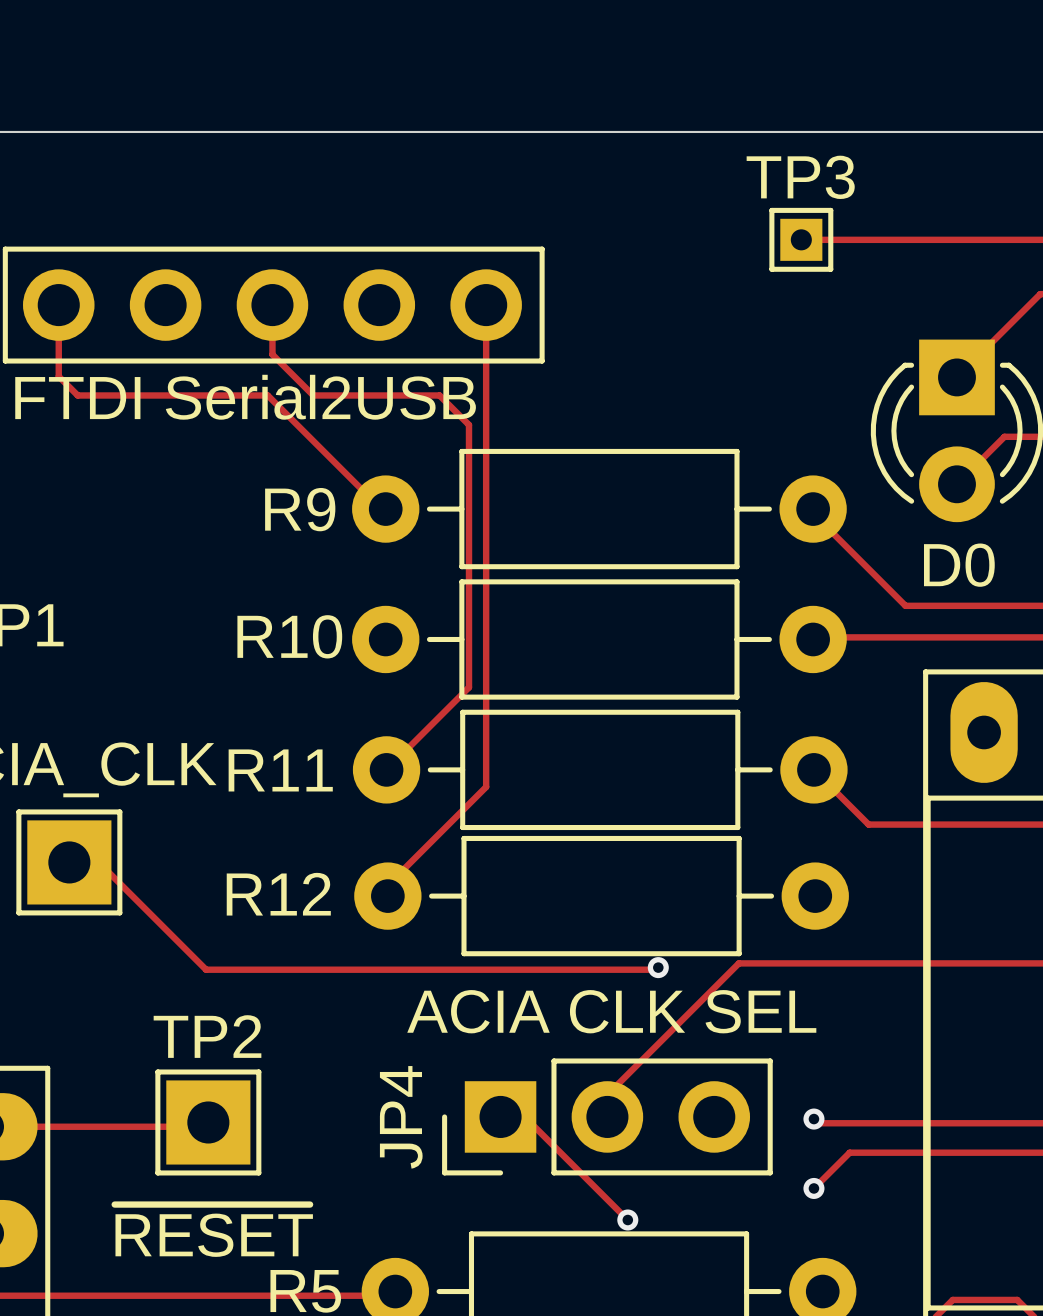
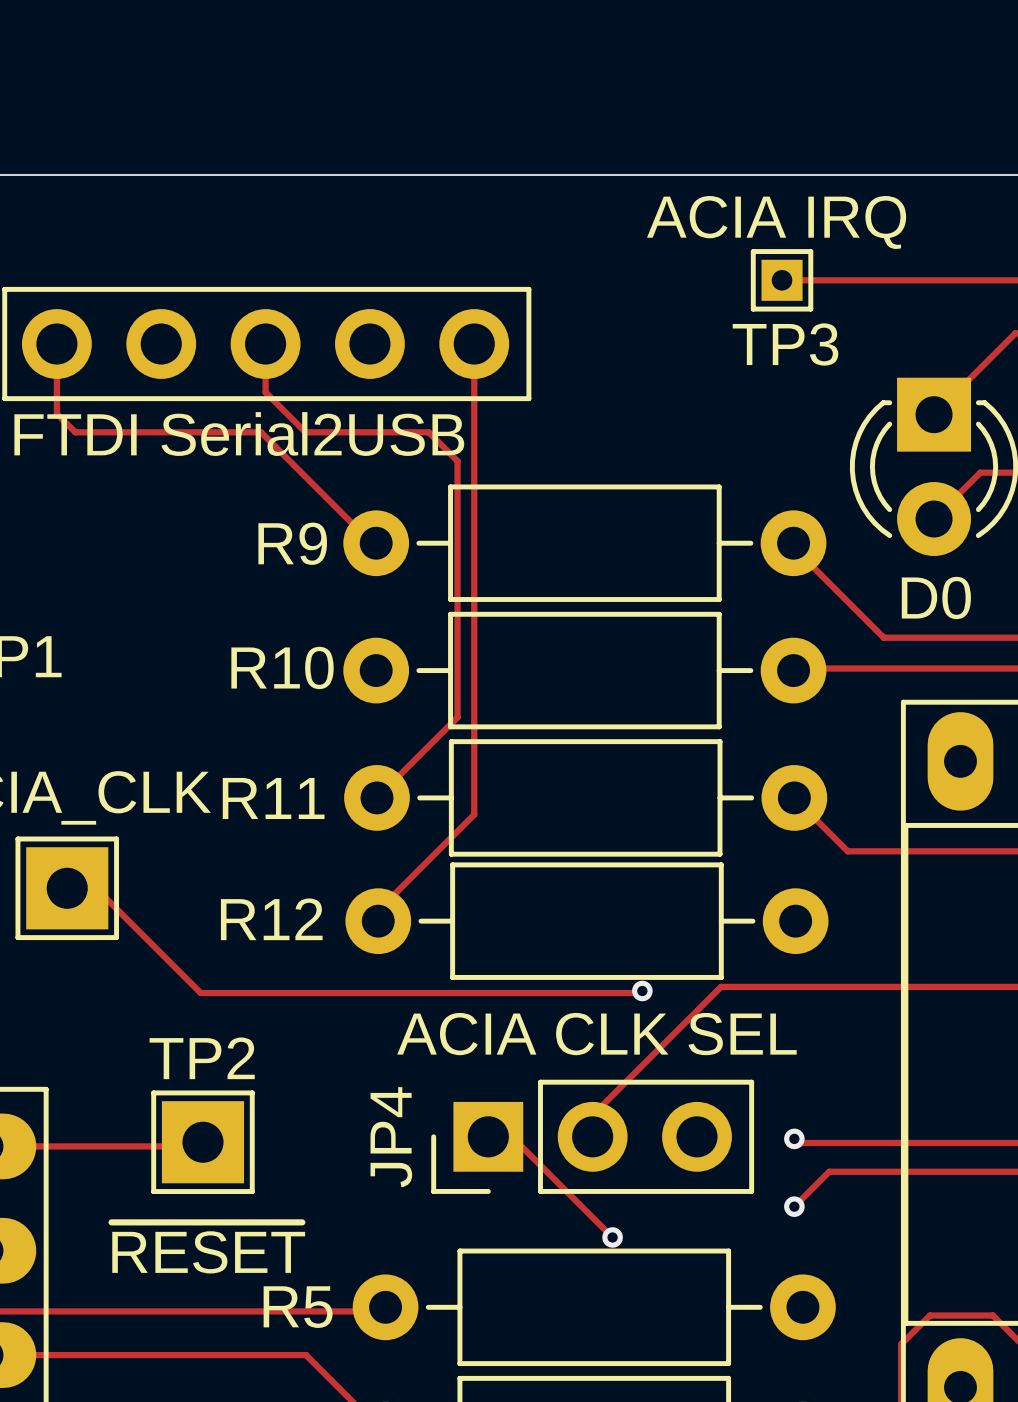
TP3 name position: TP3 (800, 177) -> TP3 (785, 344)
TP3 value: none -> ACIA IRQ (776, 222)

